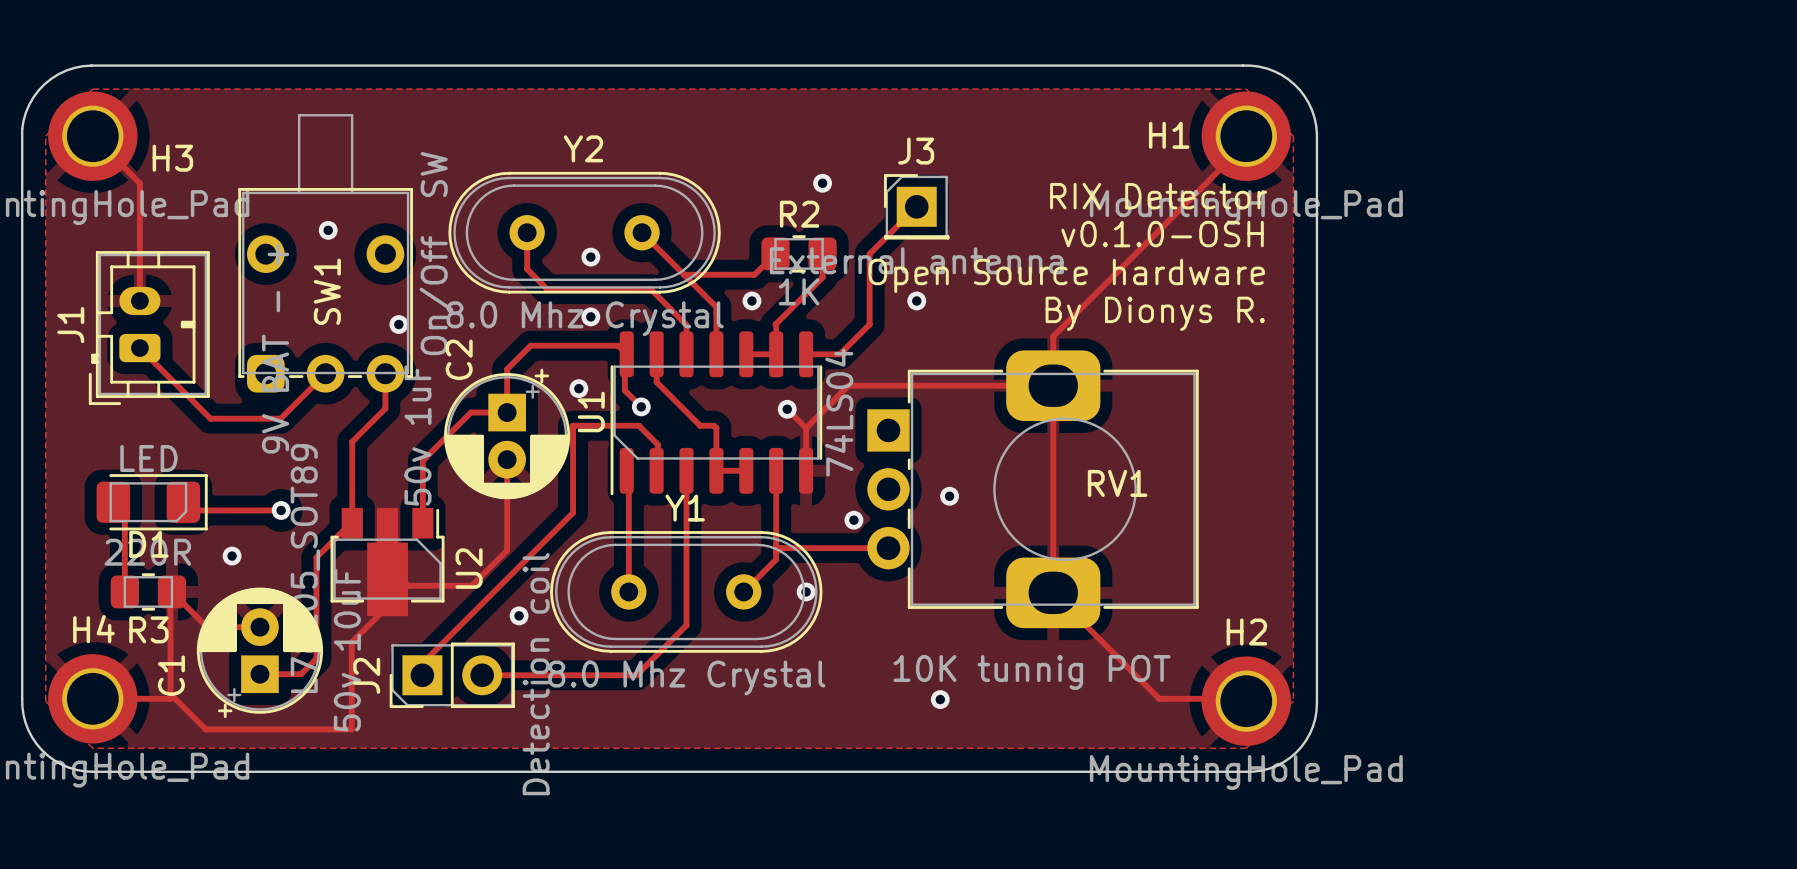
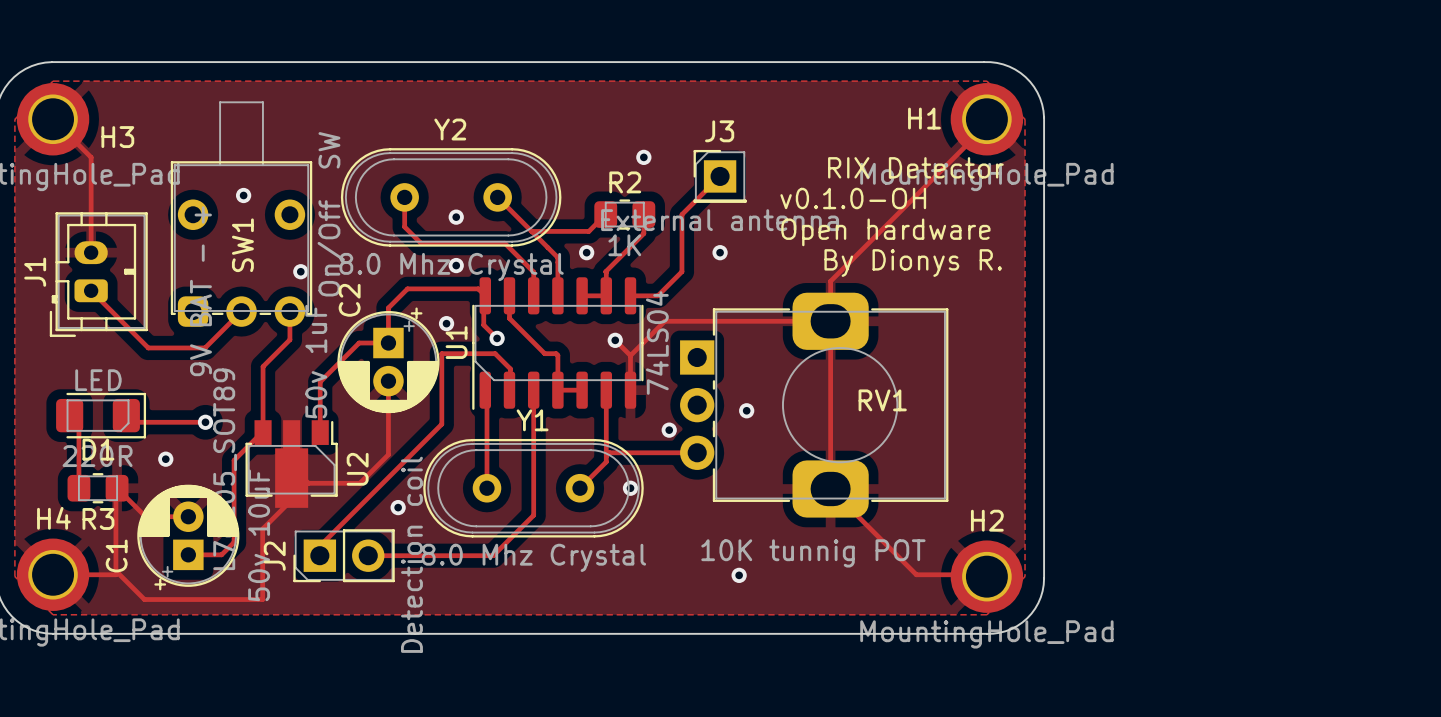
text: v0.1.0-OSH (1162, 234) -> v0.1.0-OH (853, 198)
text: Open Source hardware (1066, 275) -> Open hardware (885, 232)

